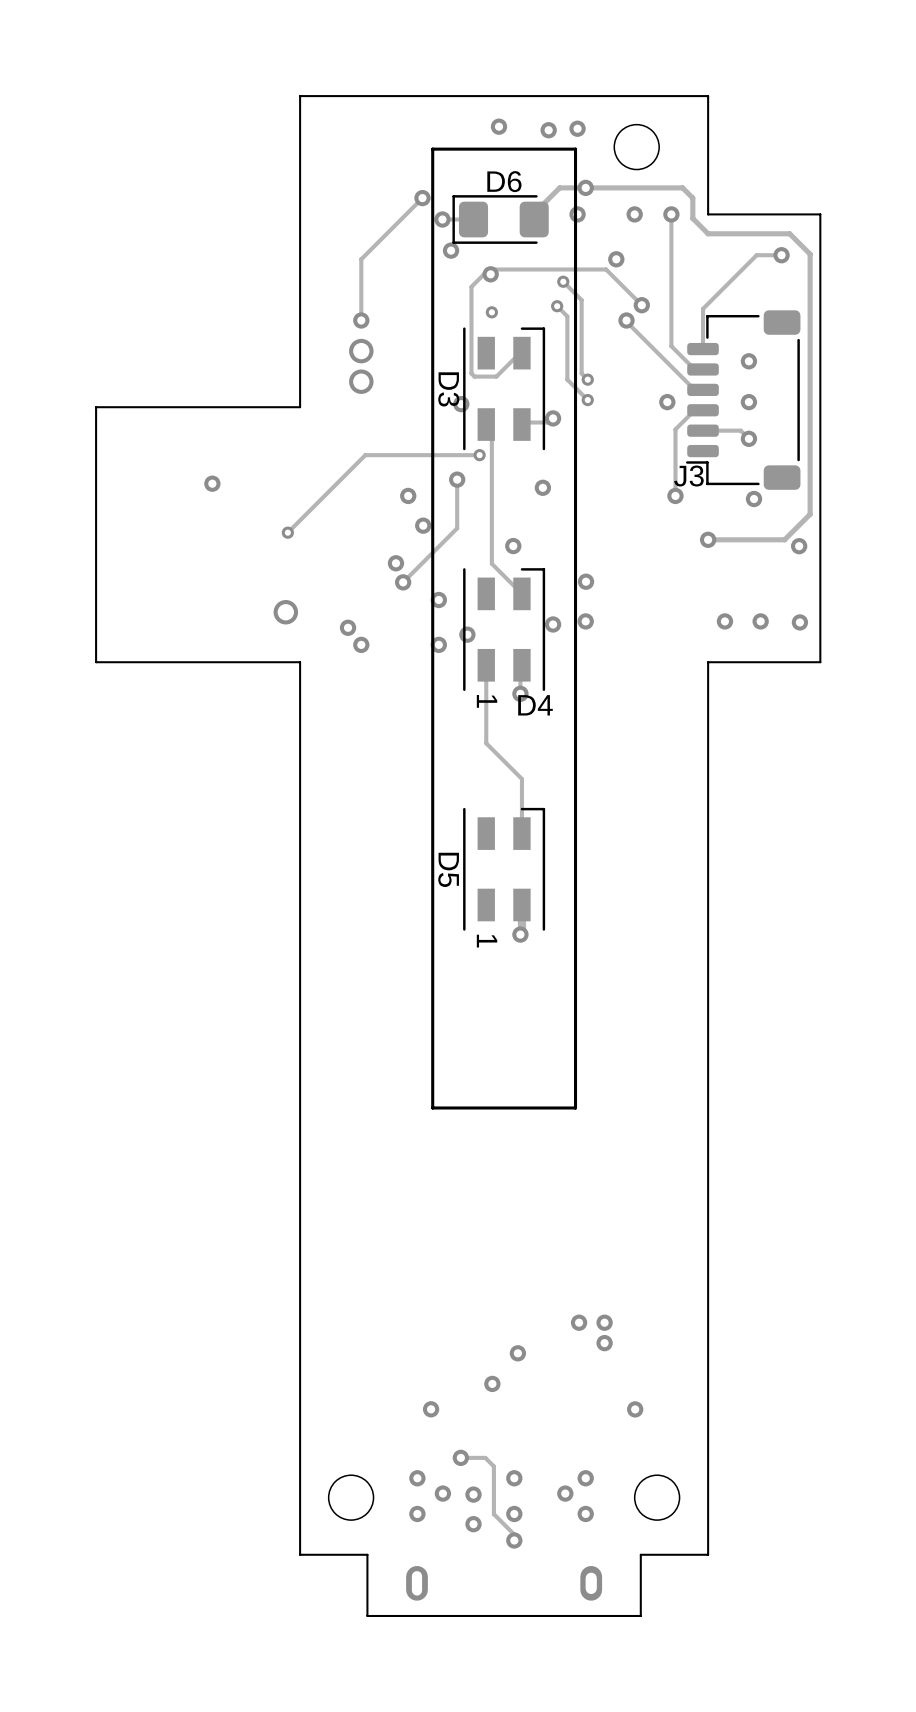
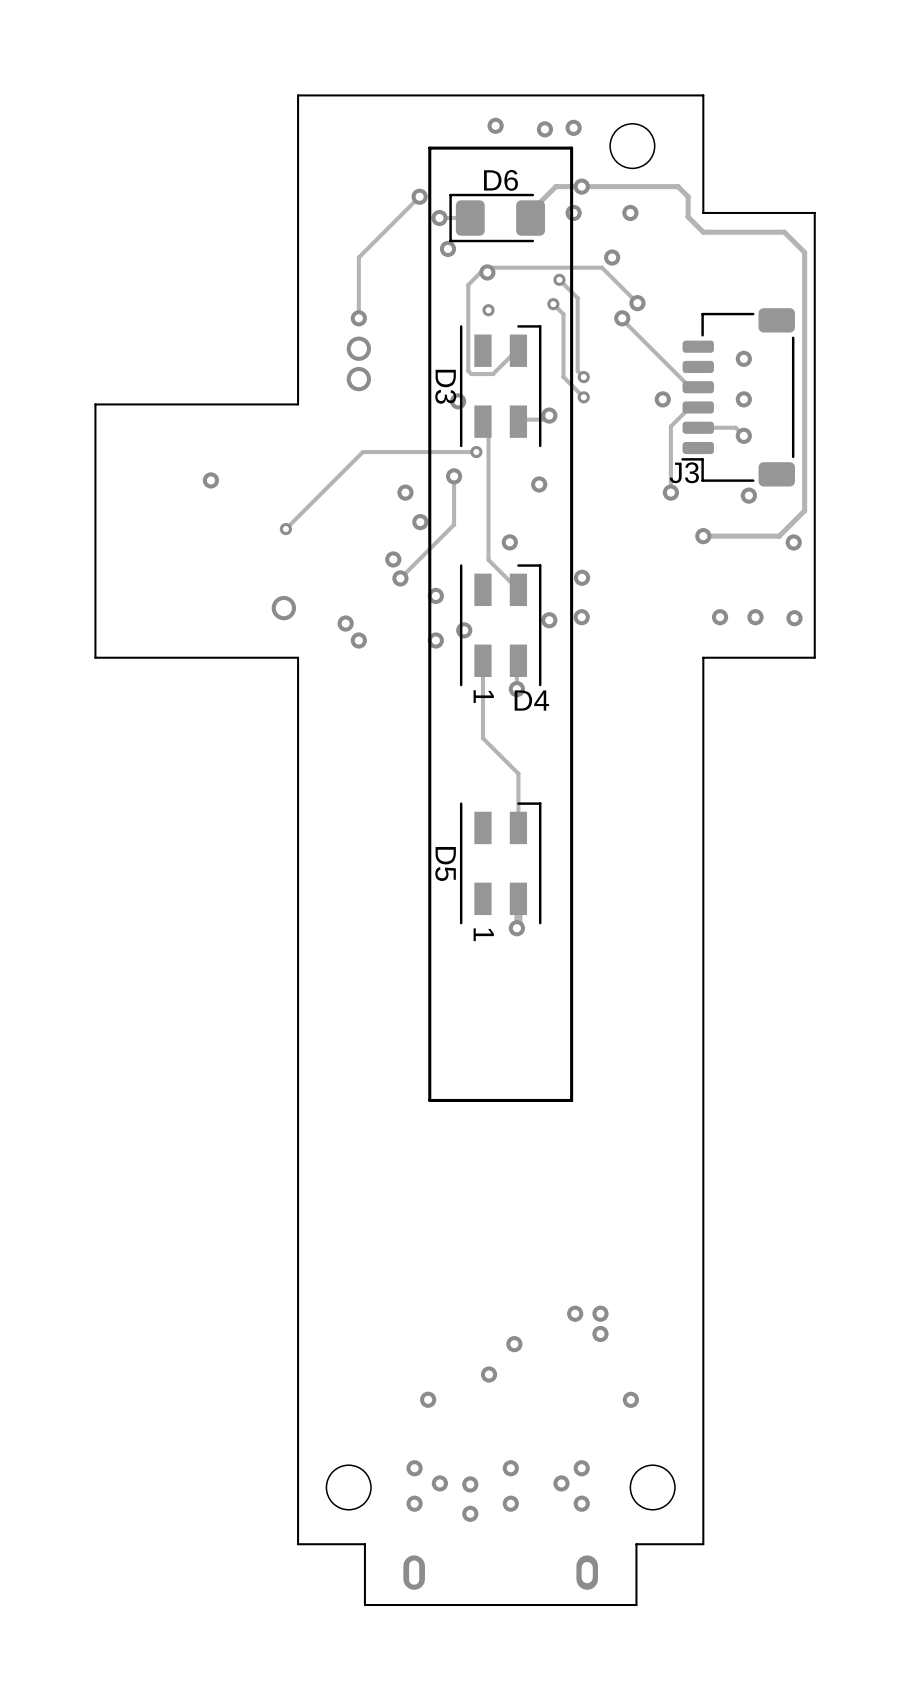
track: (671, 214) (671, 346) (694, 369) -> none
via: (671, 214) -> none
track: (781, 255) (756, 255) (703, 308) (703, 349) -> none
via: (781, 255) -> none
track: (460, 1457) (485, 1457) (493, 1466) (493, 1514) (514, 1534) (514, 1540) -> none
via: (460, 1457) -> none
via: (514, 1540) -> none

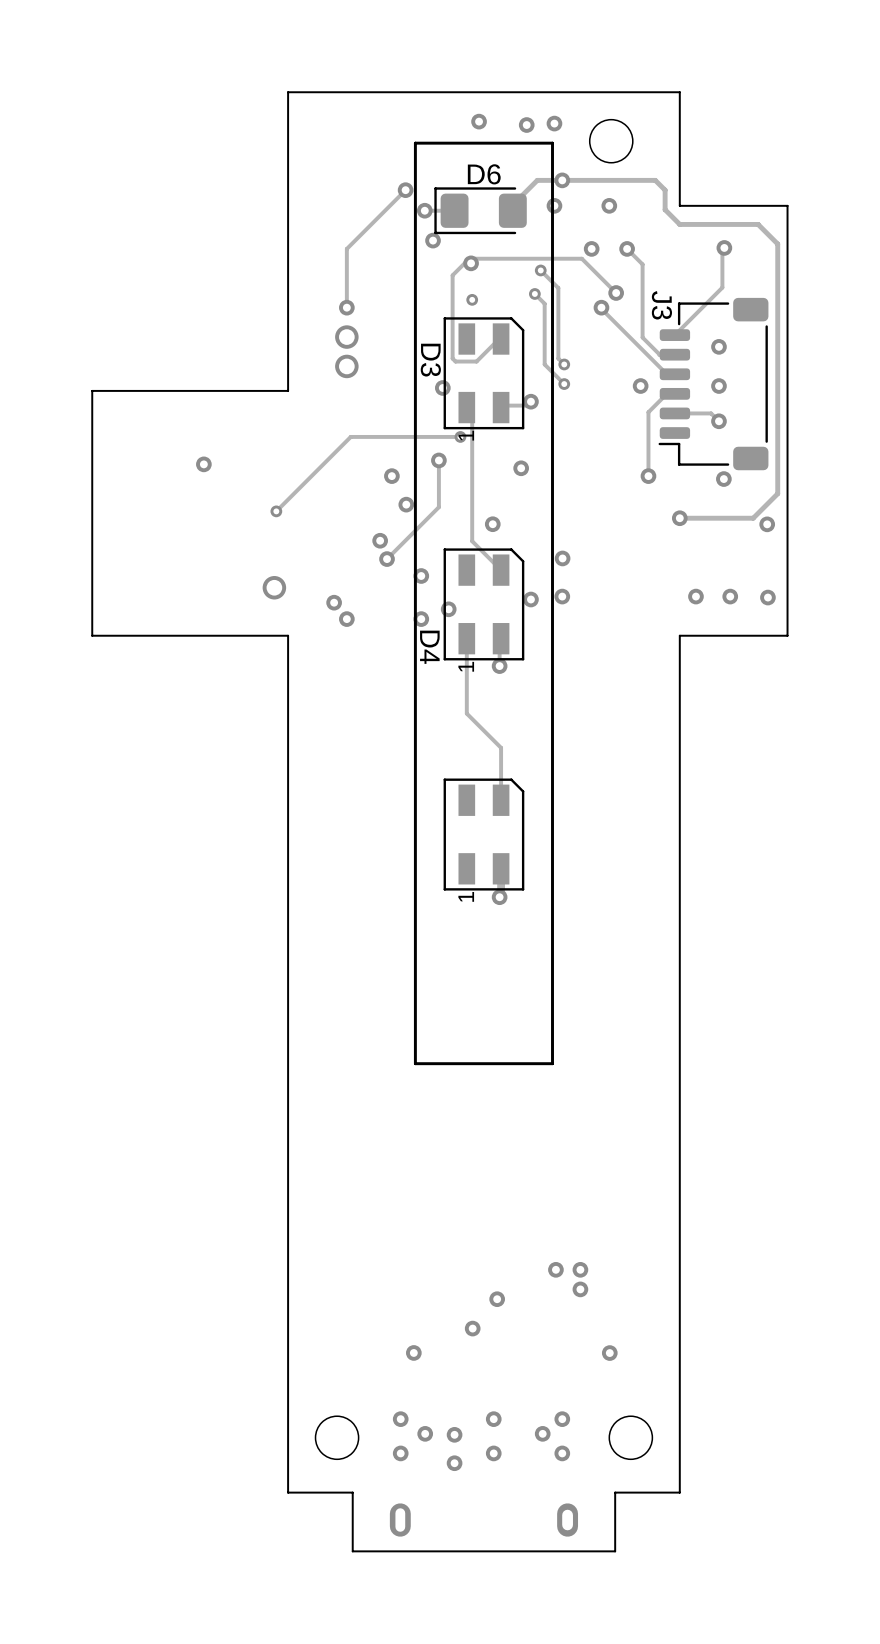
track: none -> (724, 247) (722, 249) (722, 287) (674, 335)
via: none -> (724, 247)
track: none -> (627, 248) (642, 264) (642, 337) (659, 354) (674, 354)
via: none -> (627, 248)
D3 footprint: [459, 325, 542, 448] -> [443, 317, 525, 430]
J3 name rotation: 0° (684, 472) -> 90° clockwise (661, 305)
J3 name position: J3 (684, 472) -> J3 (661, 305)
D4 footprint: [459, 564, 542, 687] -> [443, 548, 525, 661]
D4 name position: D4 (531, 700) -> D4 (429, 647)
D5: (500, 863) -> none
part: none -> (483, 834)

